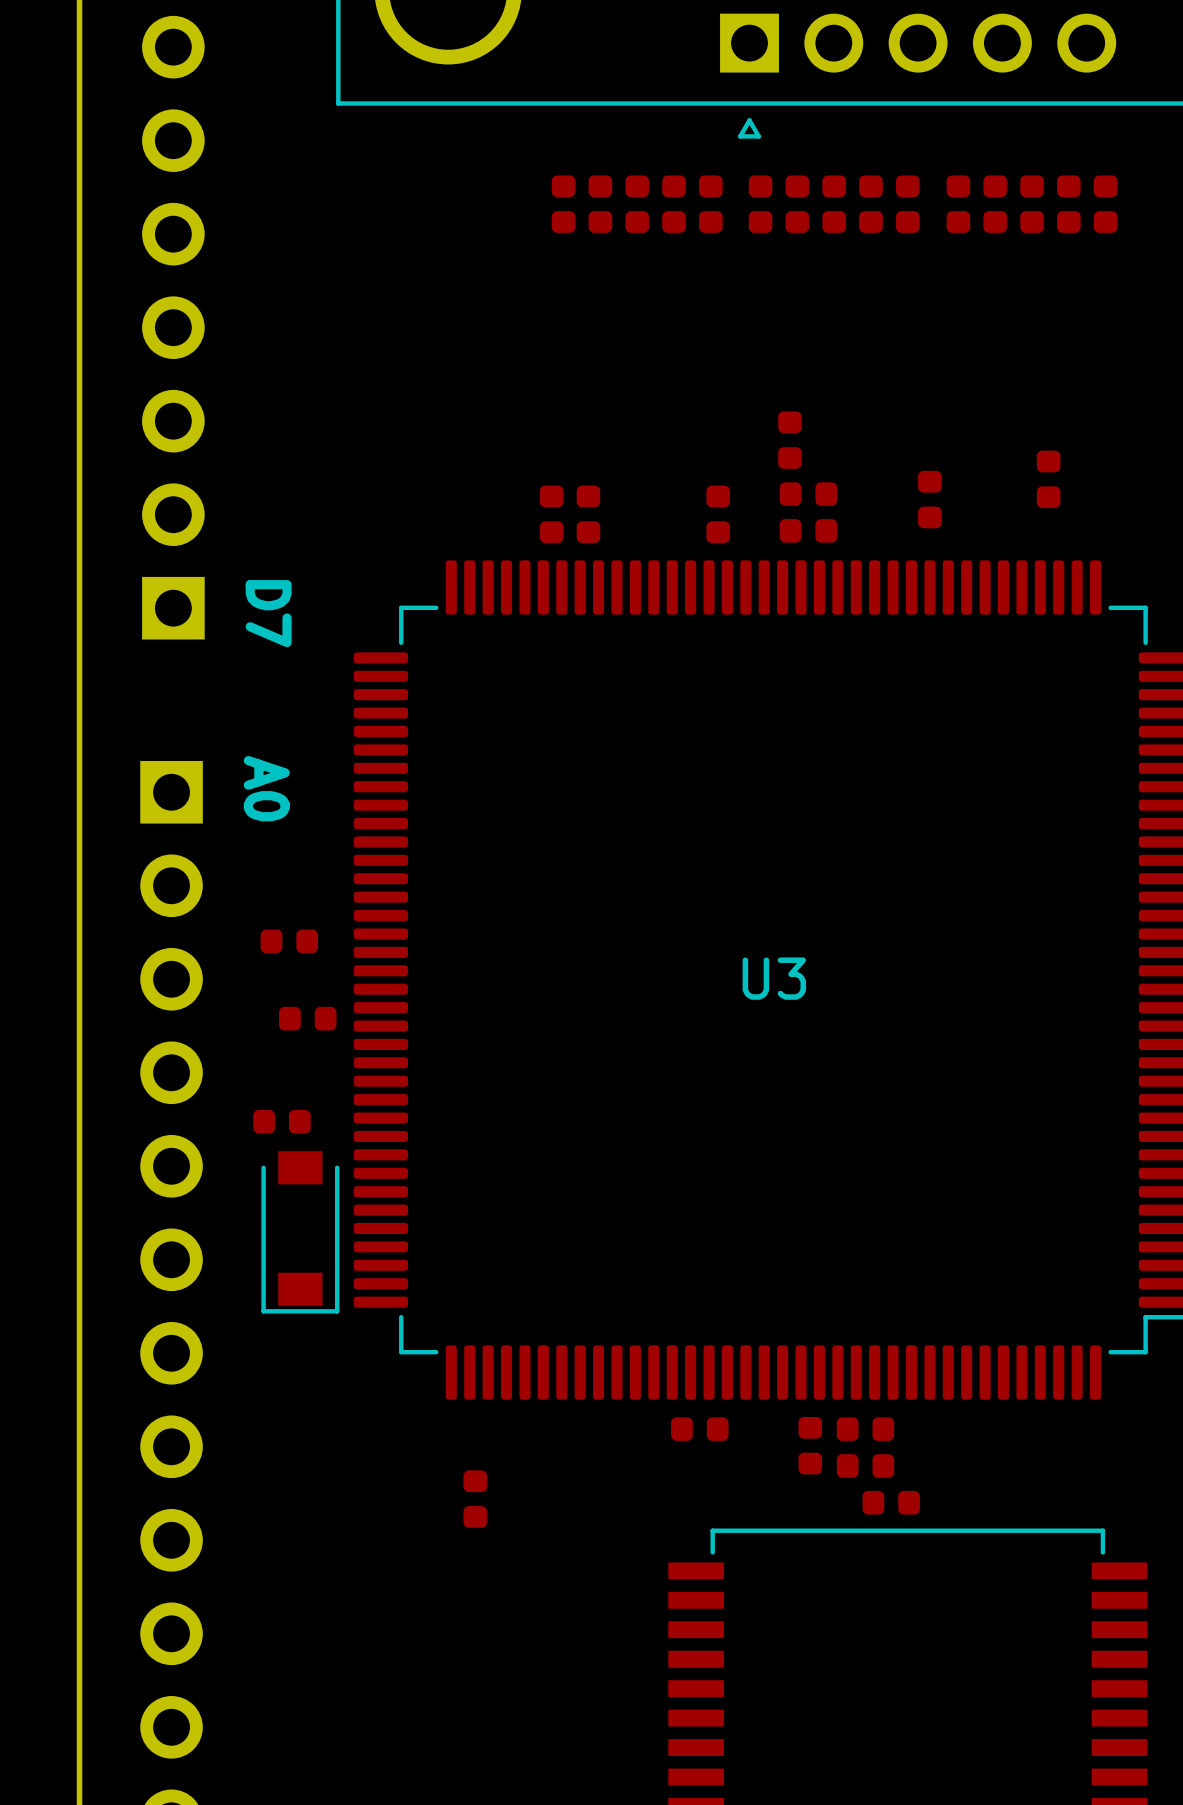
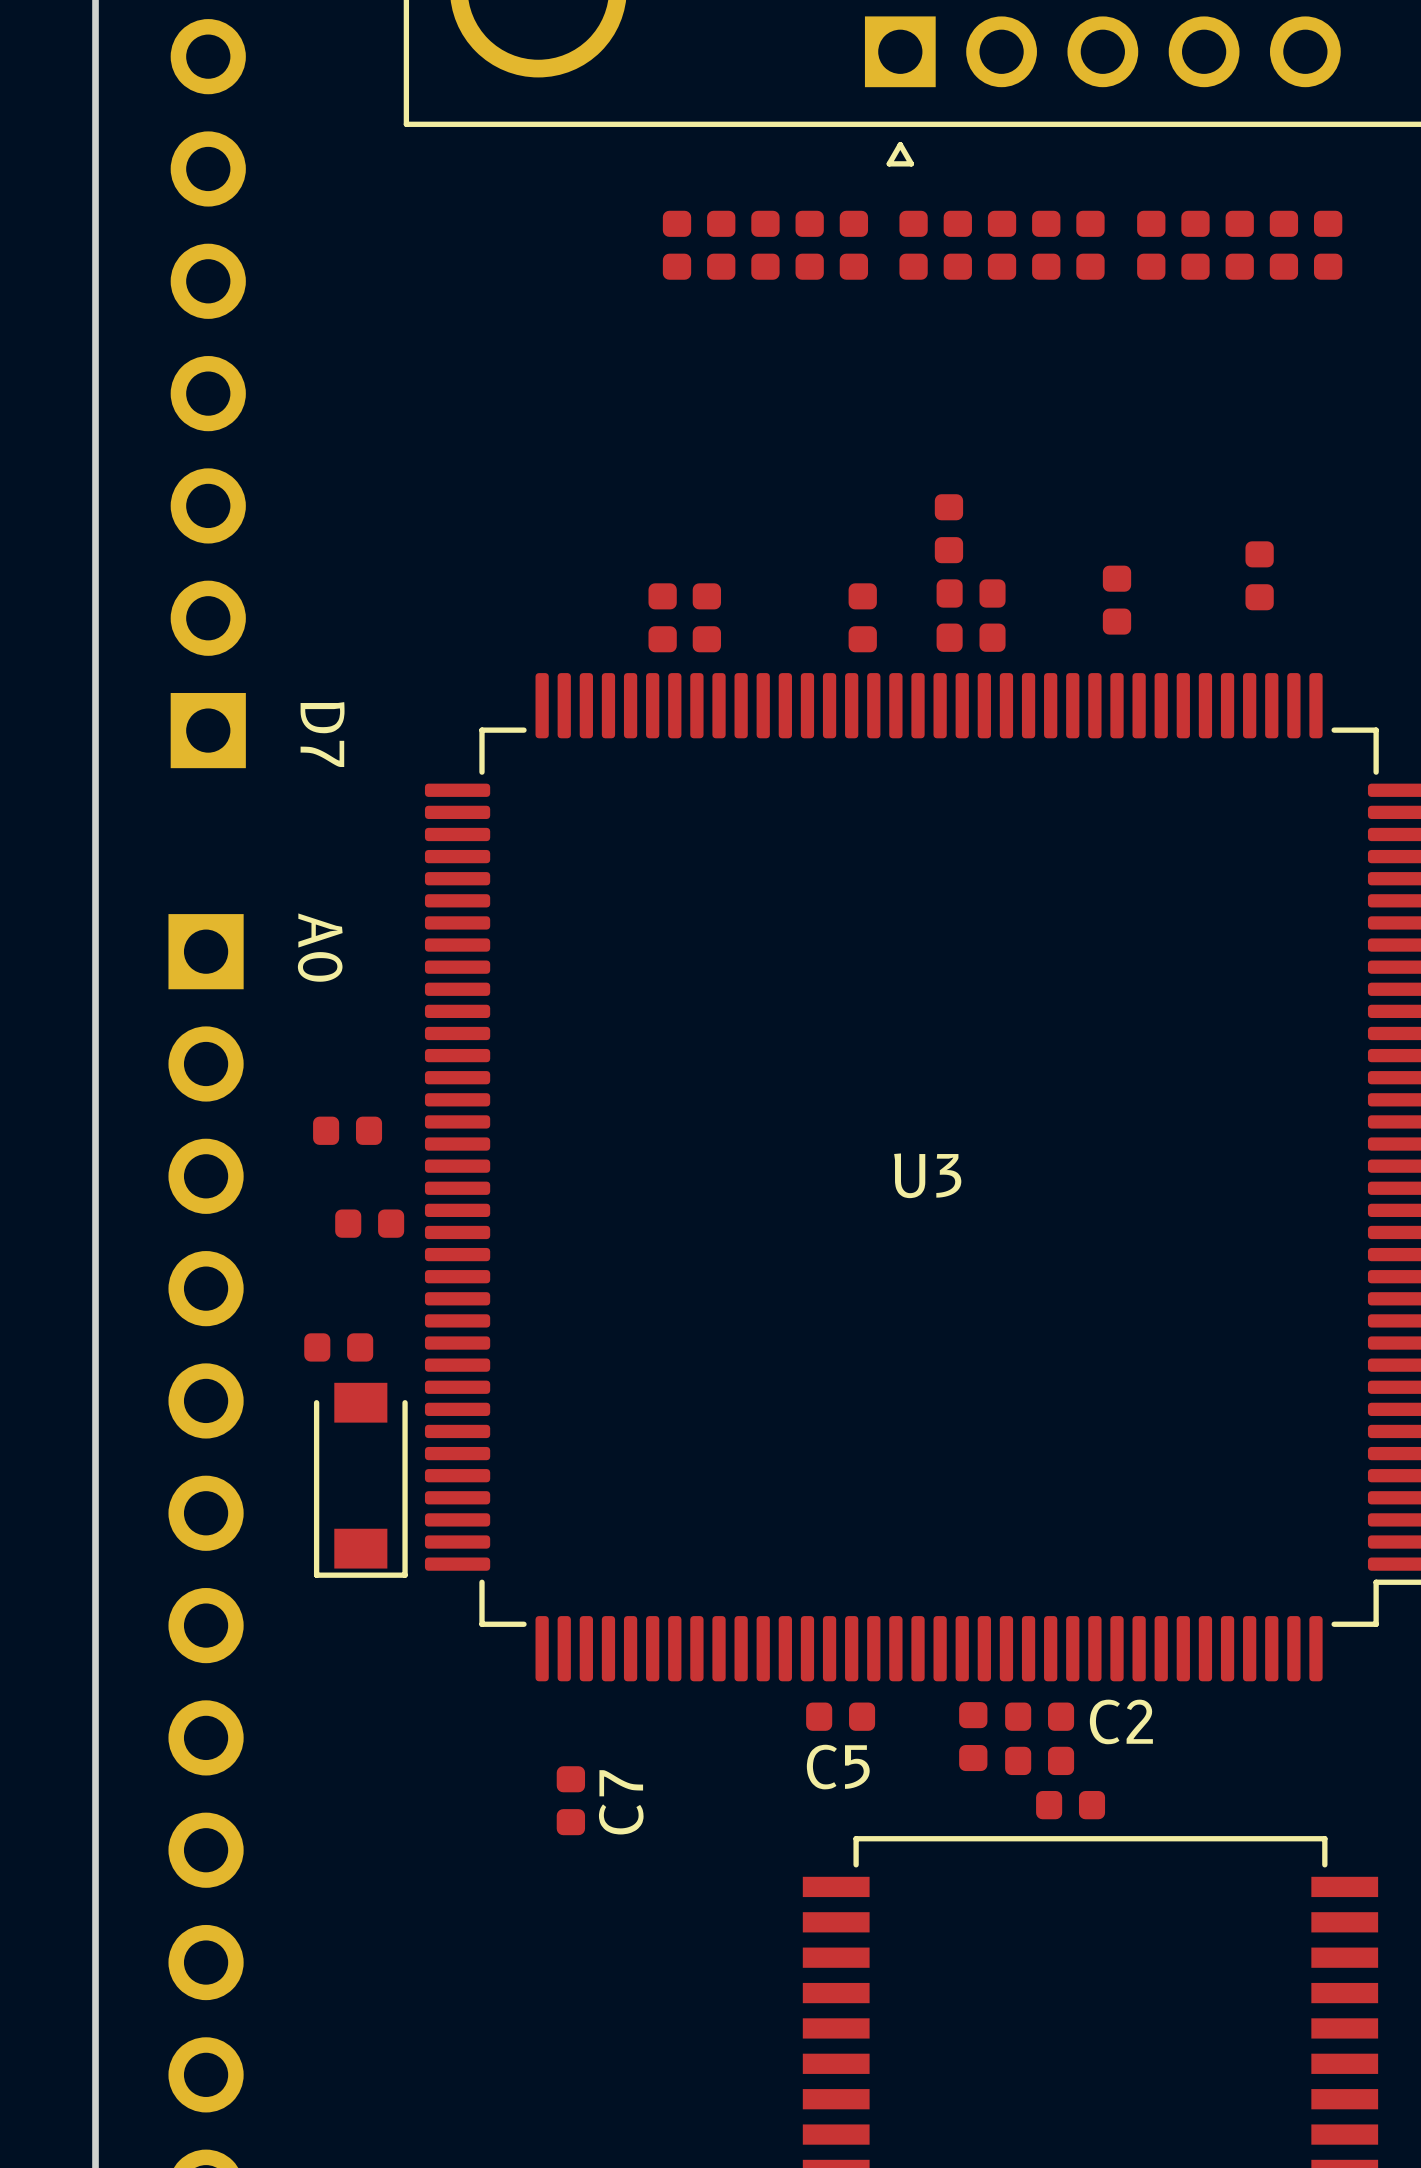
C2 name: none -> C2 (1121, 1721)
C5 name: none -> C5 (838, 1767)
C7 name: none -> C7 (621, 1802)

